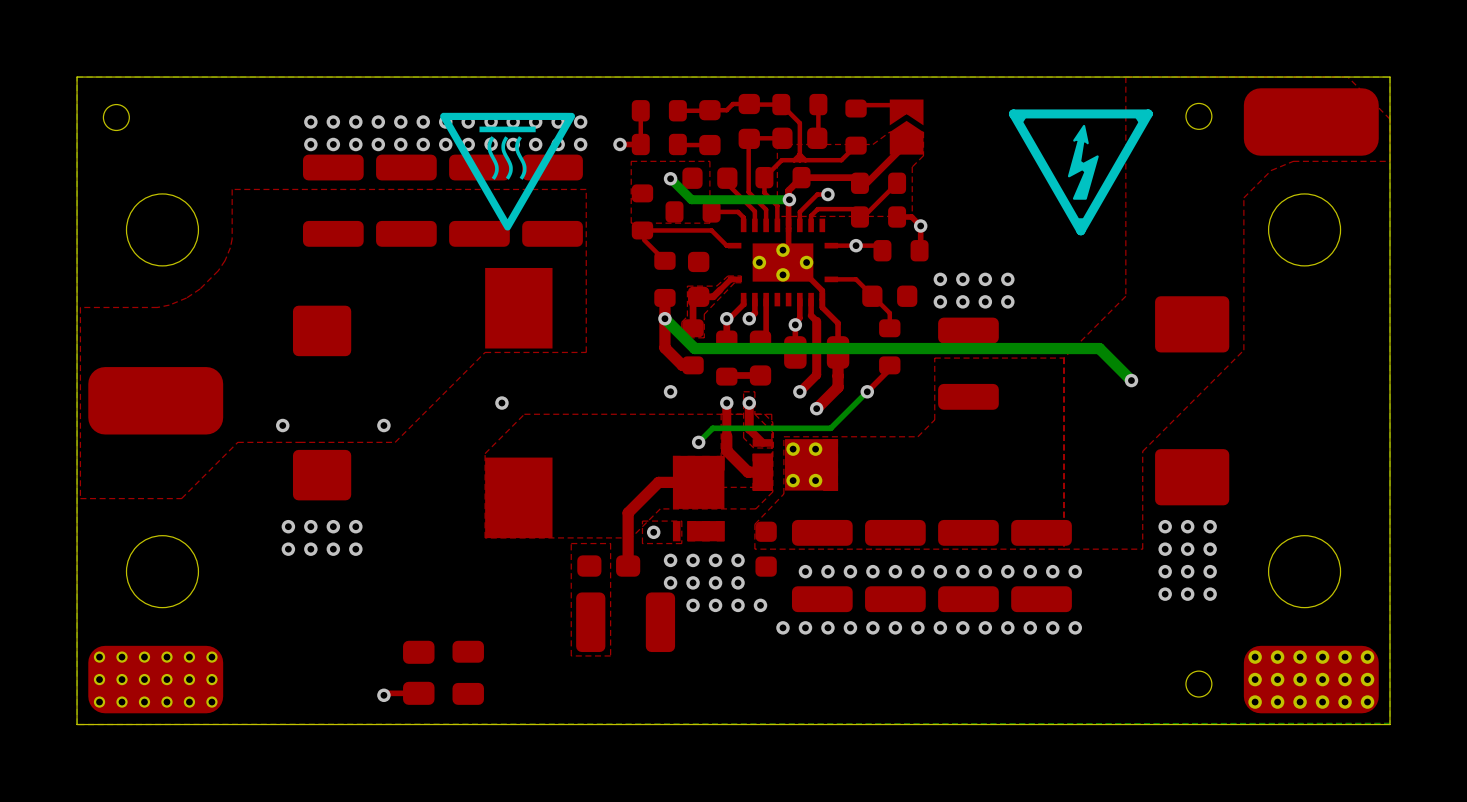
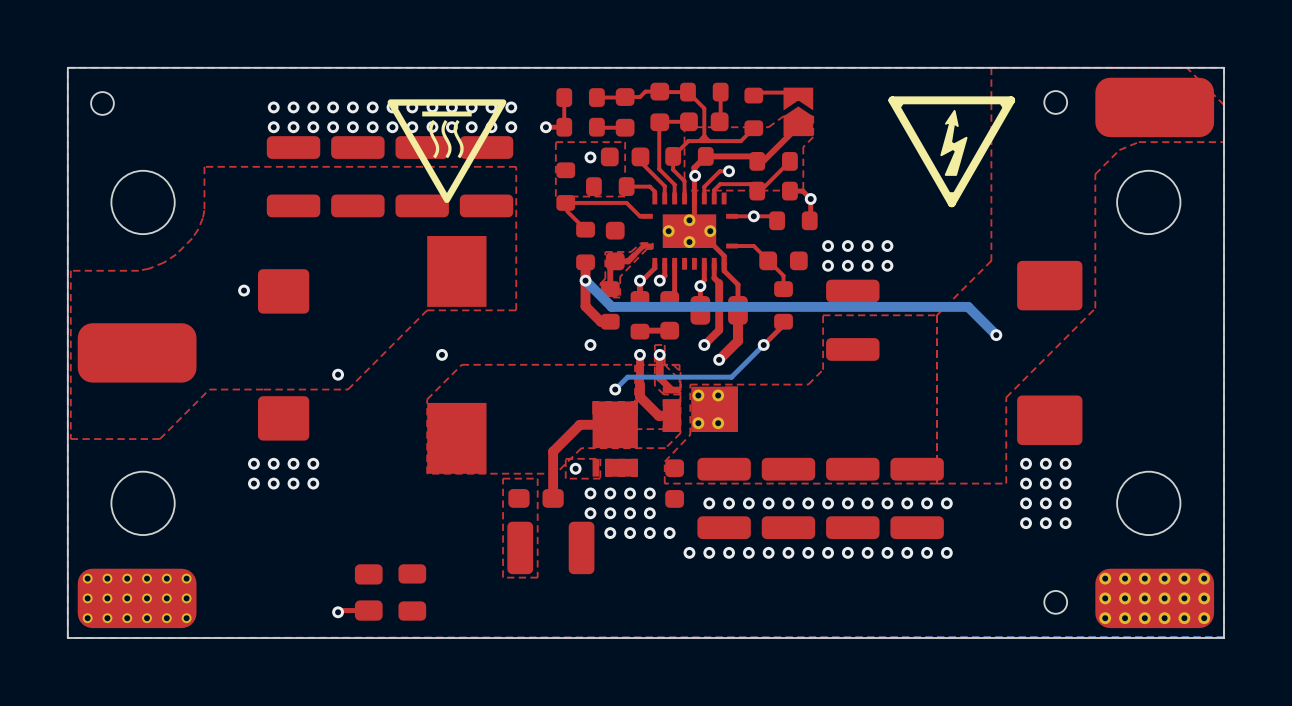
bottom track: (670, 178) (691, 199) (789, 199) -> none
via position: (282, 425) -> (244, 290)

